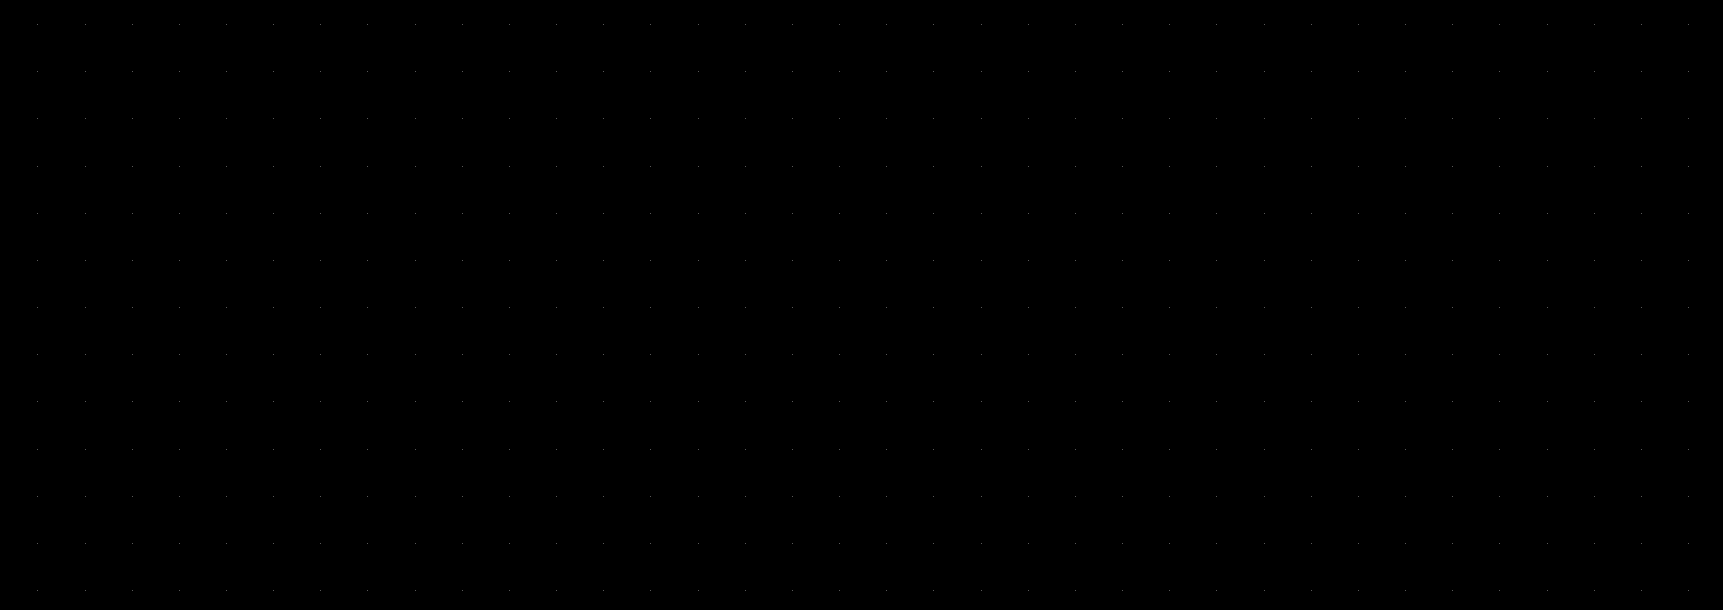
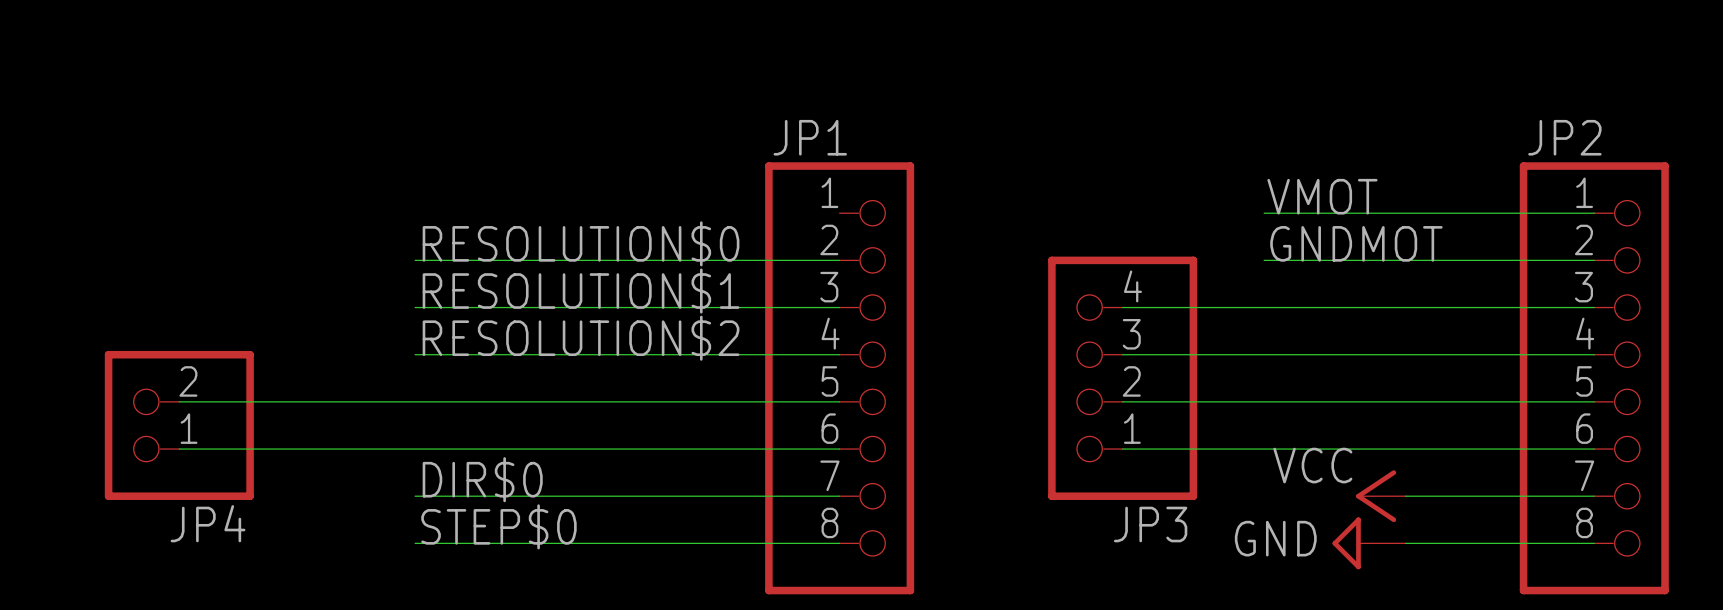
label: none -> VMOT (1322, 196)
wire: none -> (1264, 213) (1594, 213)
label: none -> RESOLUTION$0 (581, 243)
label: none -> GNDMOT (1356, 243)
wire: none -> (415, 260) (839, 260)
wire: none -> (1264, 260) (1594, 260)
label: none -> RESOLUTION$1 (581, 291)
wire: none -> (415, 307) (839, 307)
wire: none -> (1122, 307) (1594, 307)
label: none -> RESOLUTION$2 (581, 338)
wire: none -> (415, 354) (839, 354)
wire: none -> (1122, 354) (1594, 354)
JP1: none -> (839, 378)
JP3: none -> (1122, 378)
JP2: none -> (1594, 378)
wire: none -> (179, 401) (839, 401)
wire: none -> (1122, 401) (1594, 401)
JP4: none -> (179, 425)
wire: none -> (179, 449) (839, 449)
wire: none -> (1122, 449) (1594, 449)
label: none -> DIR$0 (482, 479)
wire: none -> (415, 496) (839, 496)
power symbol: none -> VCC (1380, 496)
wire: none -> (1405, 496) (1594, 496)
label: none -> STEP$0 (498, 526)
wire: none -> (415, 543) (839, 543)
power symbol: none -> GND (1369, 543)
wire: none -> (1405, 543) (1594, 543)

